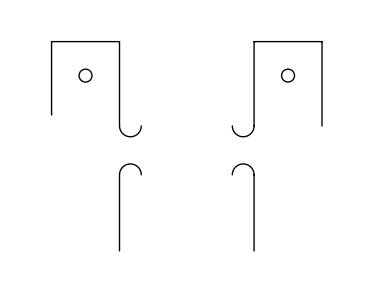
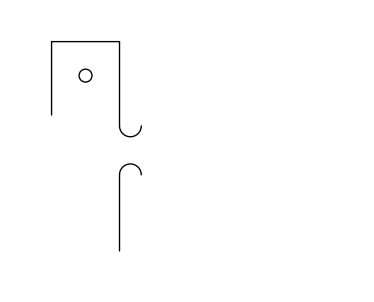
round board edge: [280, 68, 296, 83] -> none
board edge: (232, 125) (235, 133) (241, 136) (249, 134) (253, 128) (254, 41) (322, 41) (322, 125) -> none
board edge: (232, 174) (235, 167) (241, 164) (248, 165) (253, 172) (254, 250) -> none

